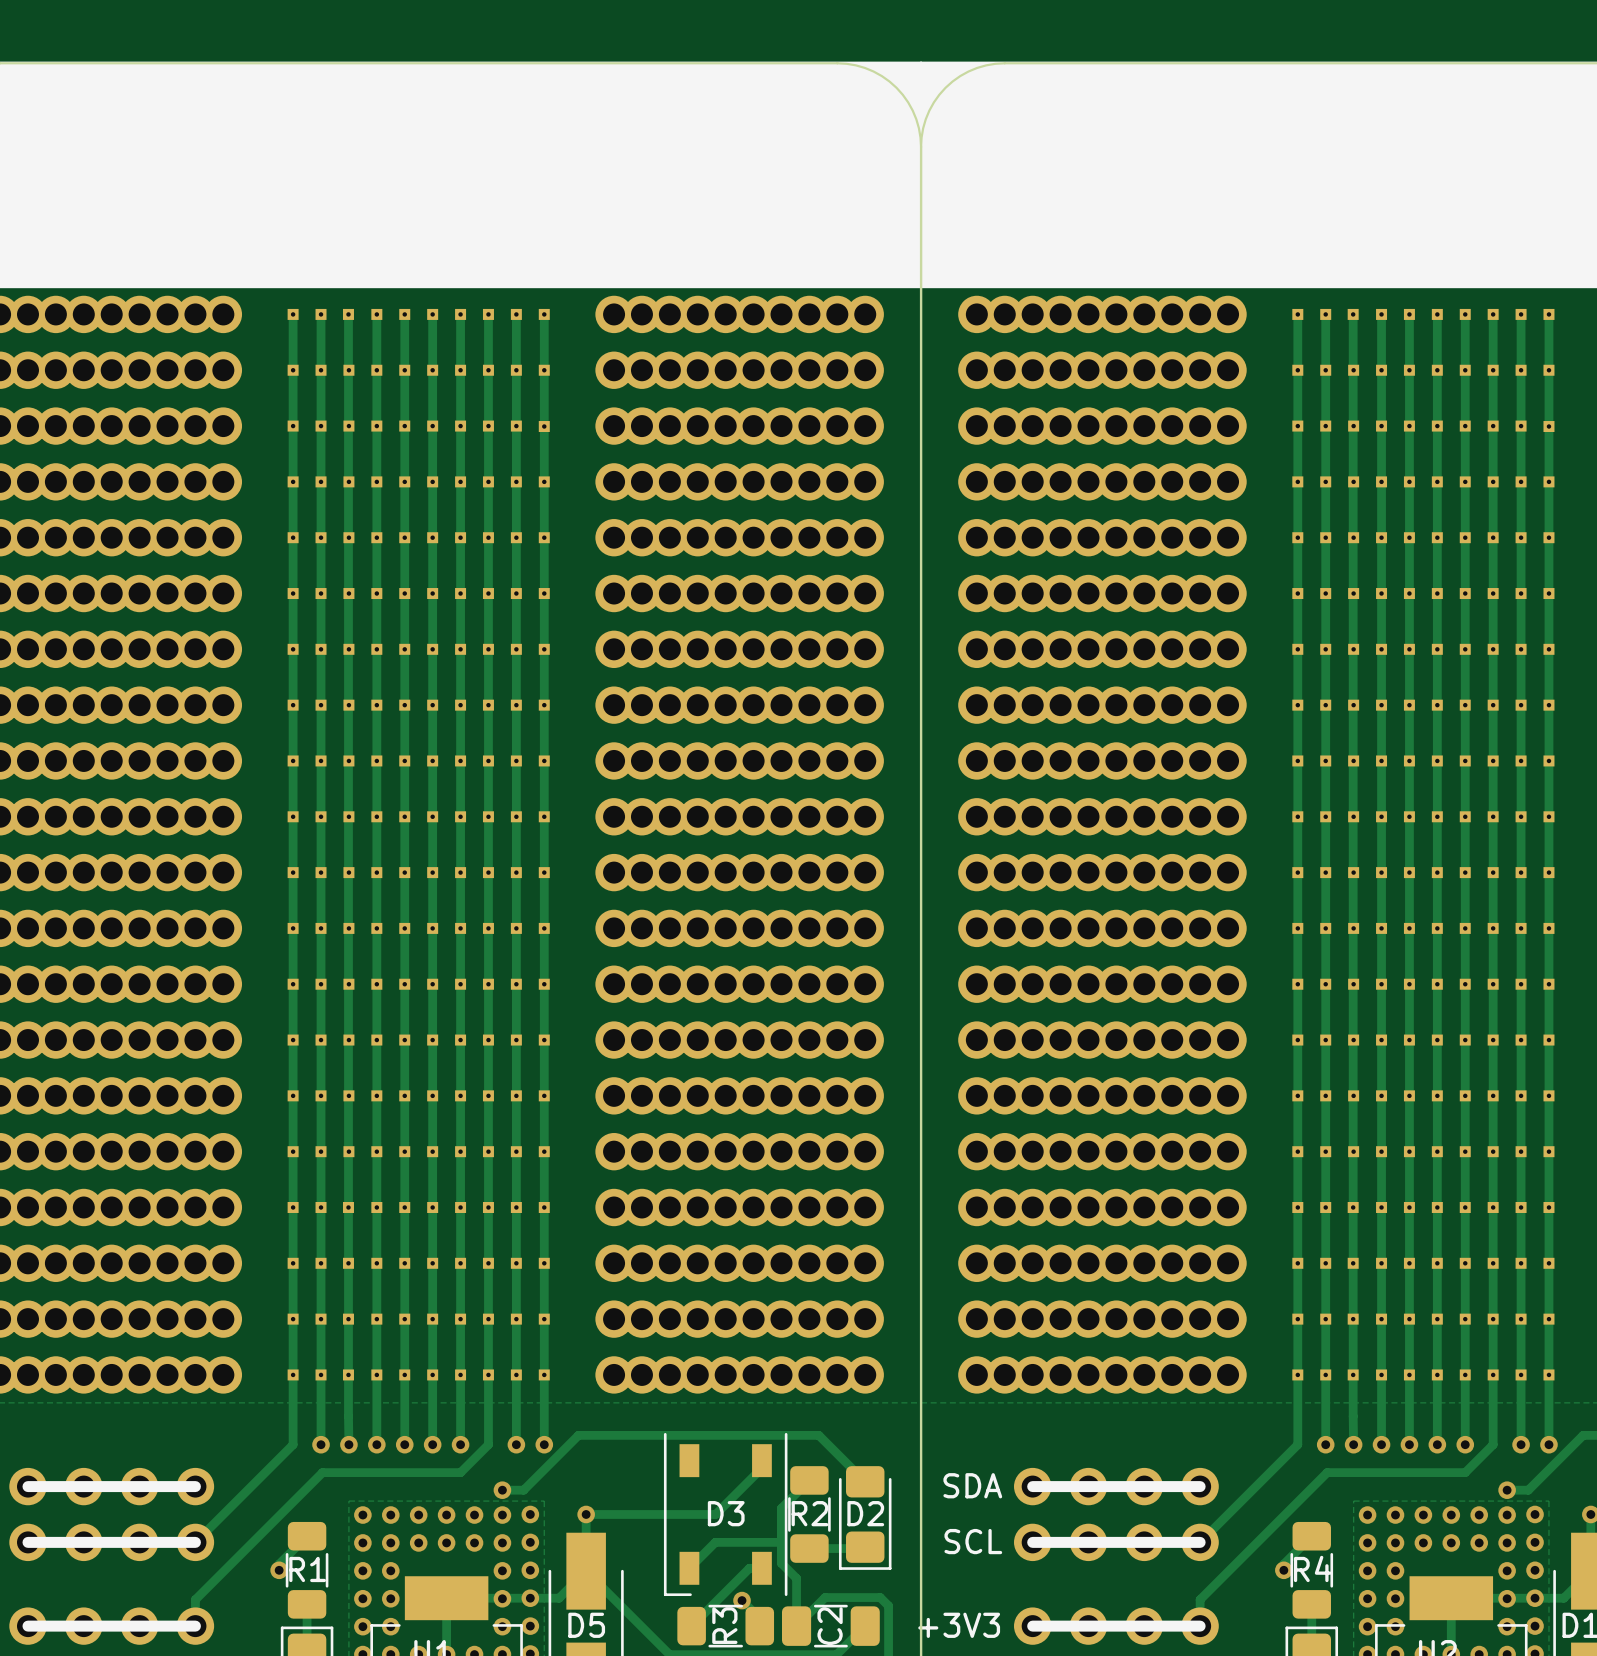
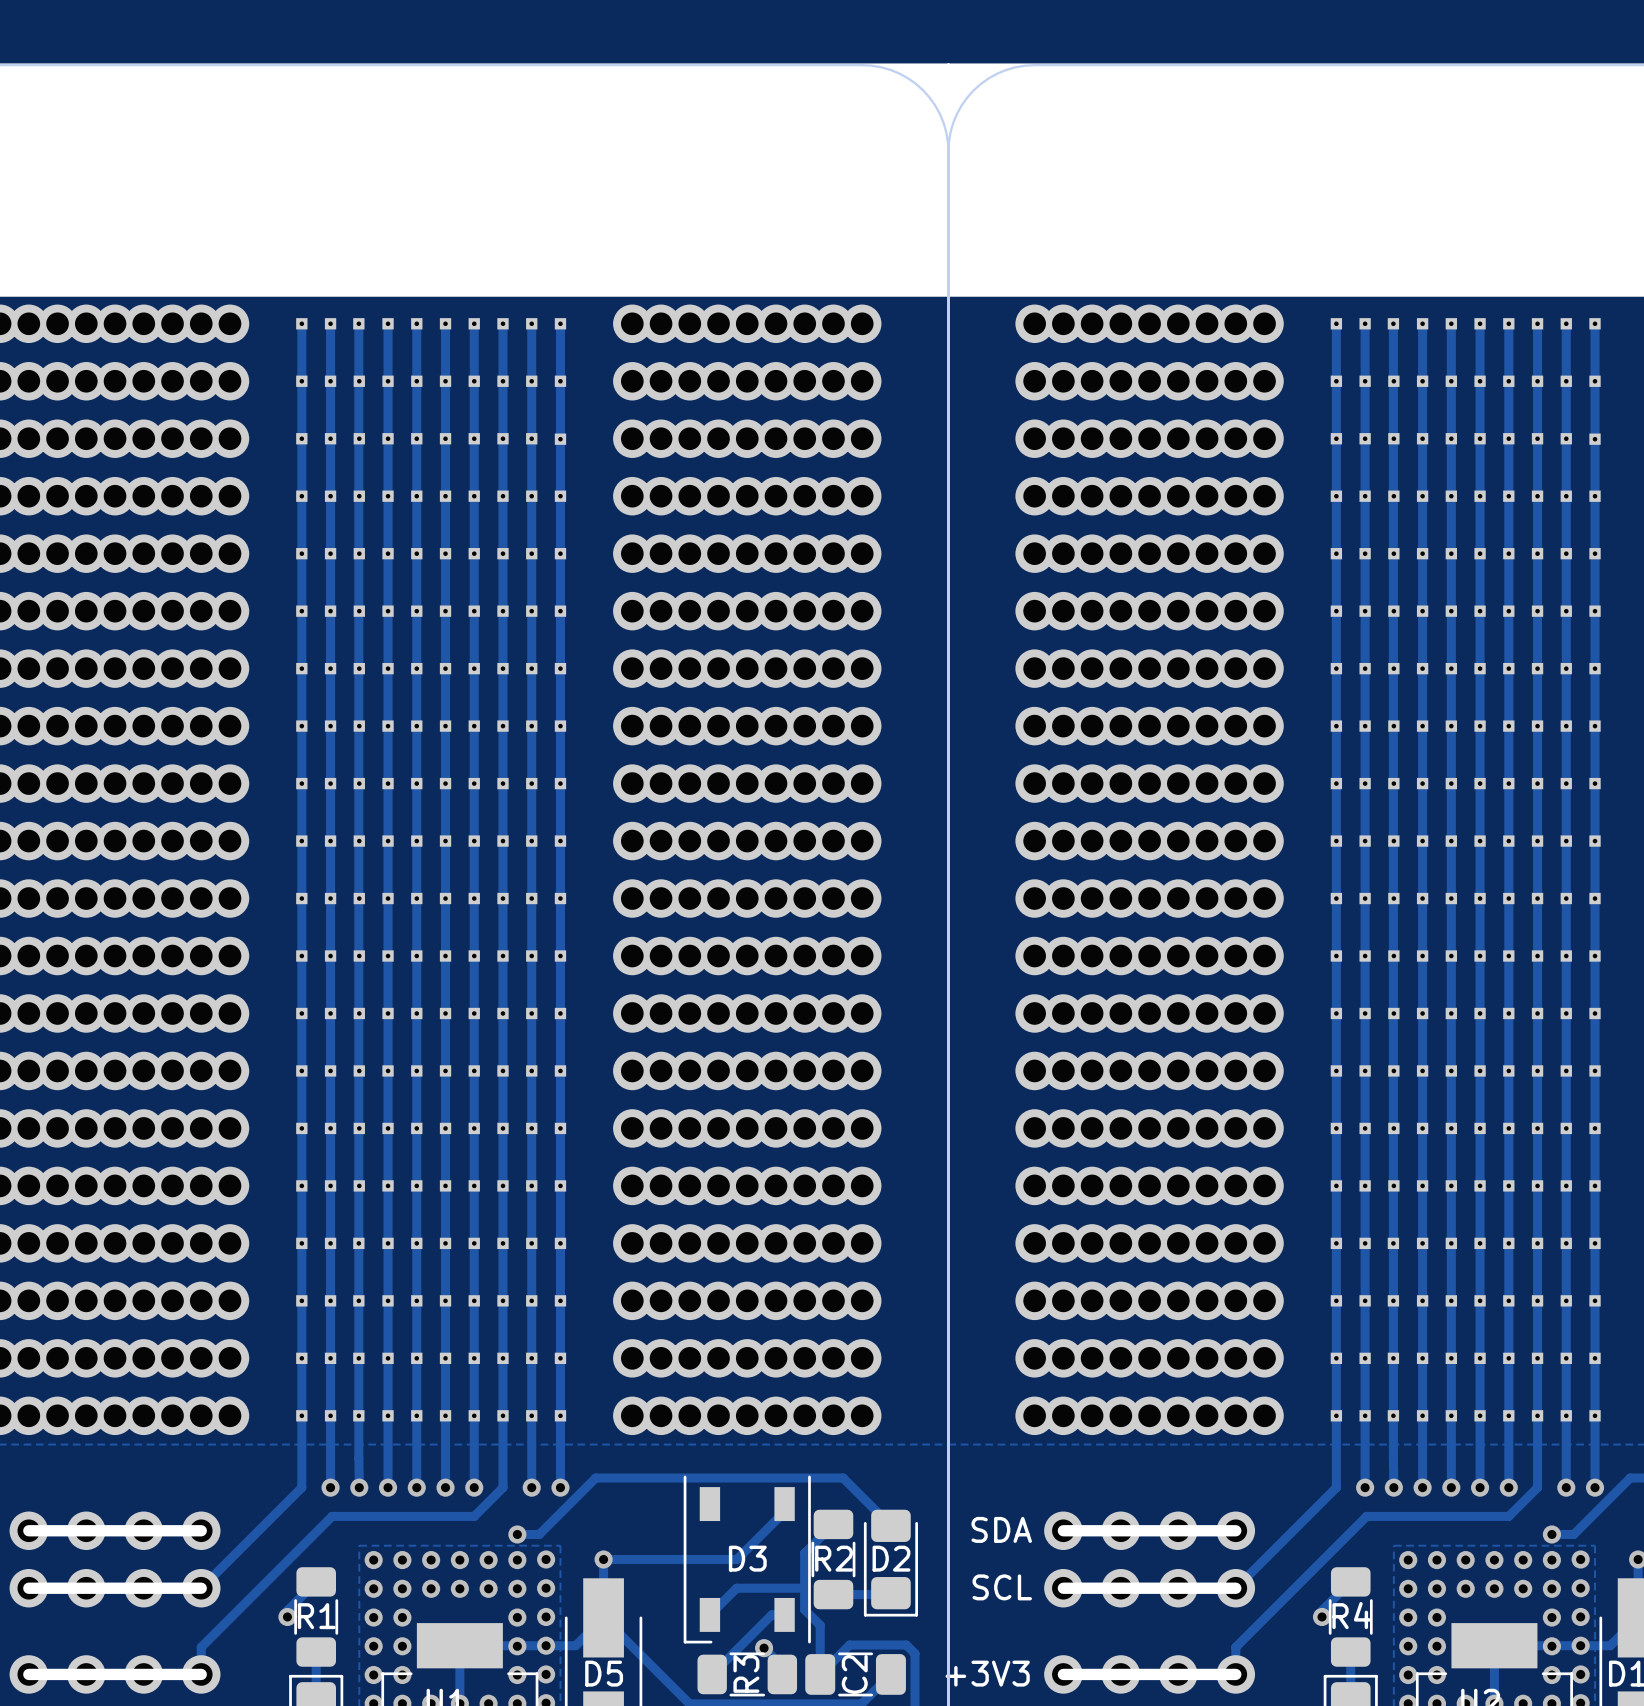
part: (865, 844) -> none
part: (976, 844) -> none

